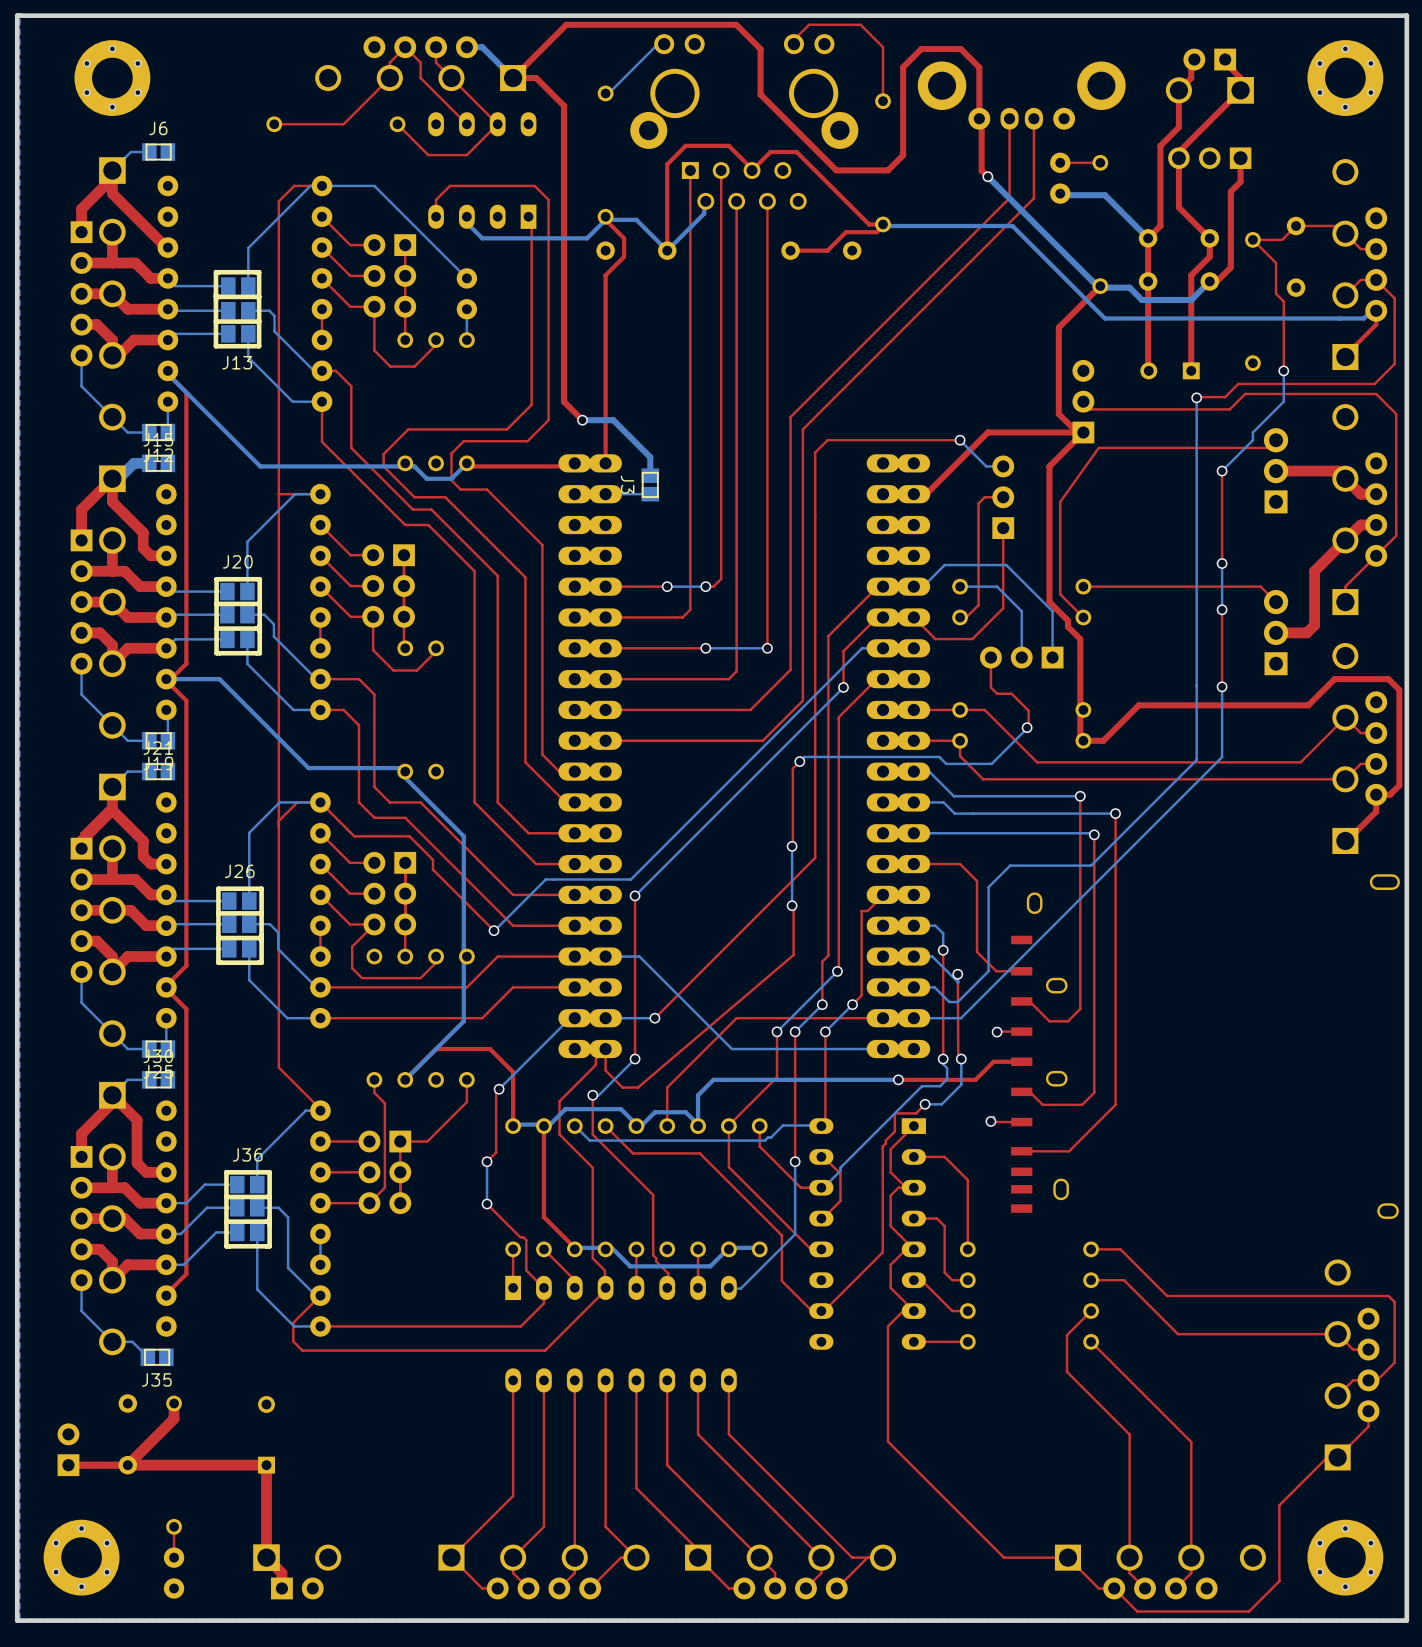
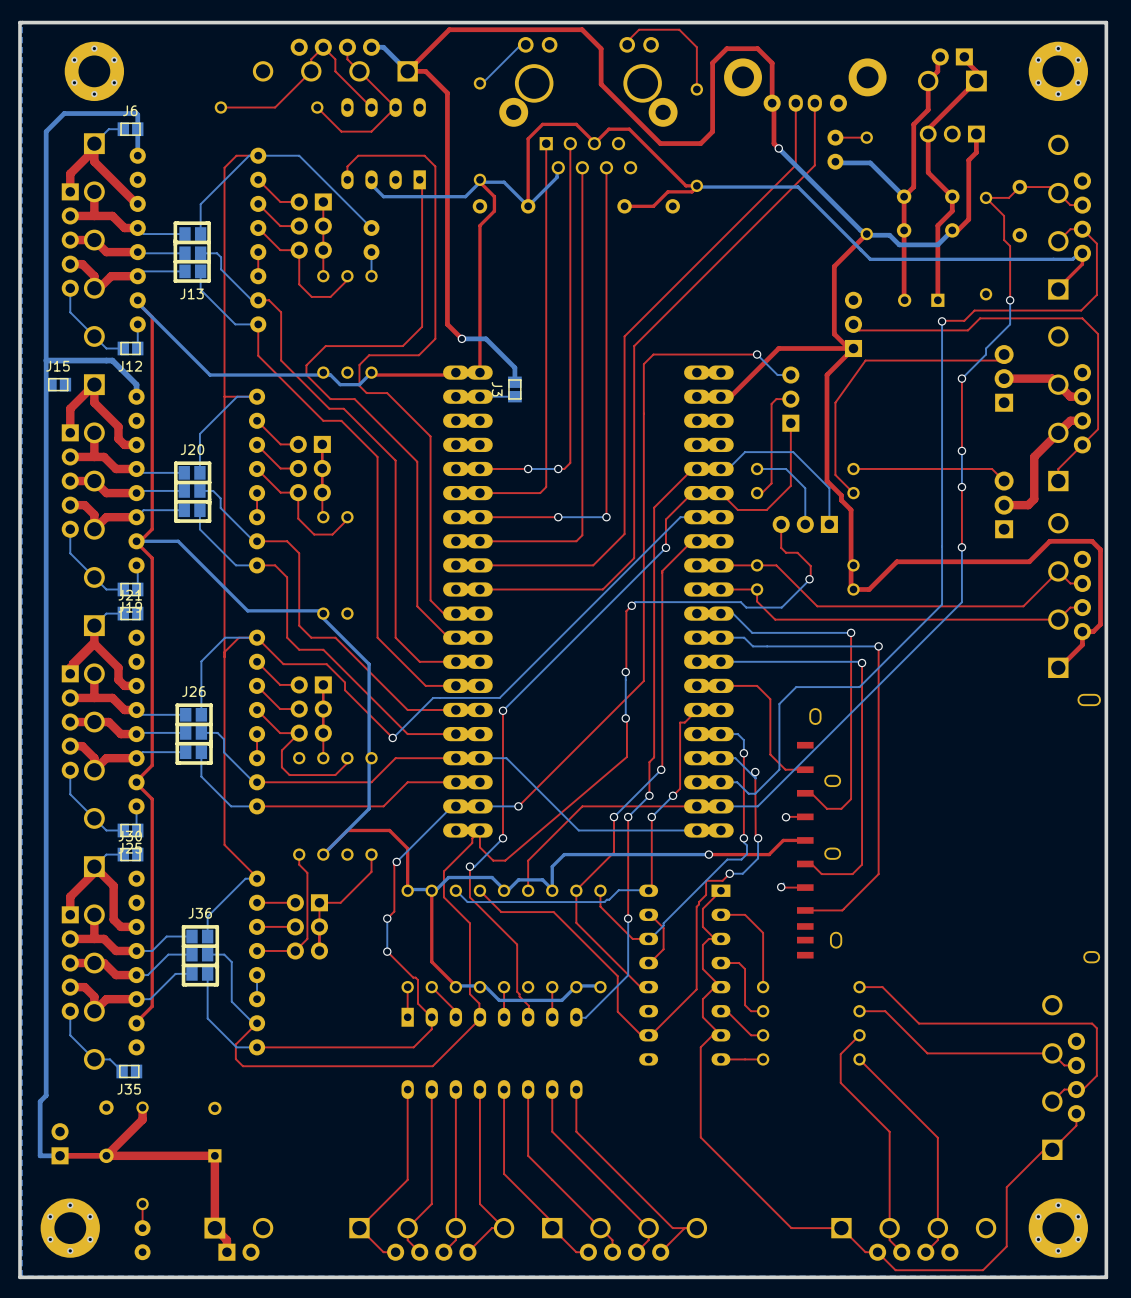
bottom track: none -> (137, 155) (136, 113) (64, 113) (46, 131) (46, 1095) (40, 1101) (40, 1155) (60, 1155)
bottom track: none -> (46, 360) (112, 360) (136, 384) (136, 396)
bottom track: (149, 463) (133, 463) (118, 478) -> none
J15 position: (158, 463) -> (58, 384)

